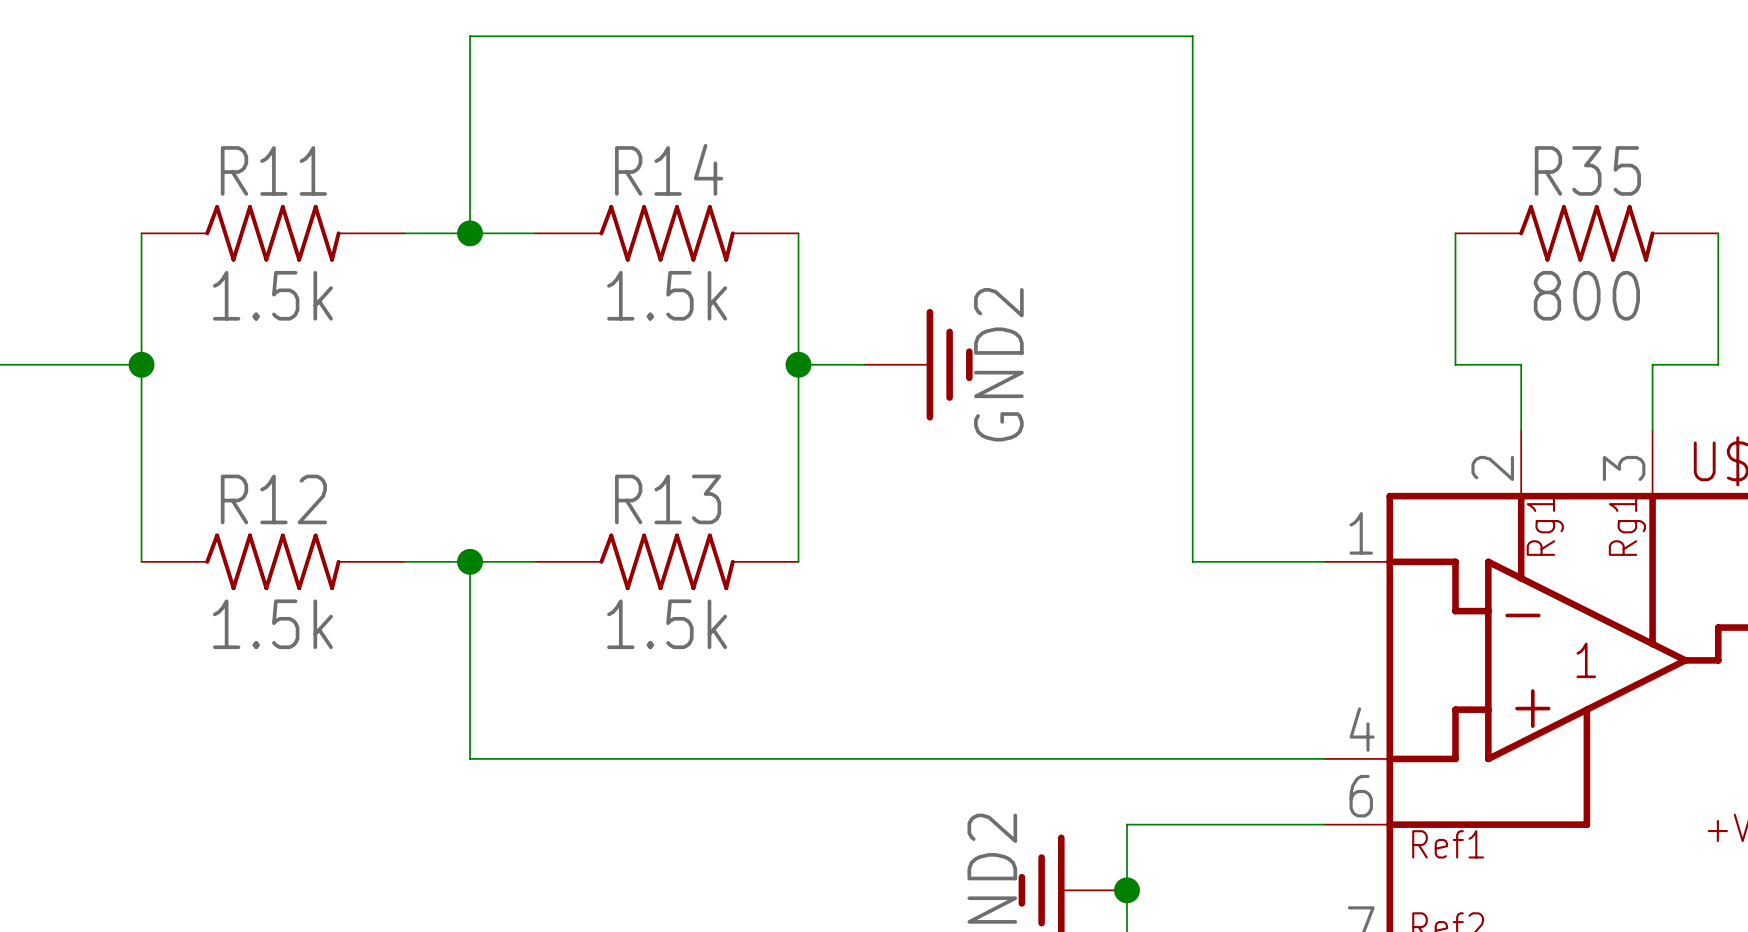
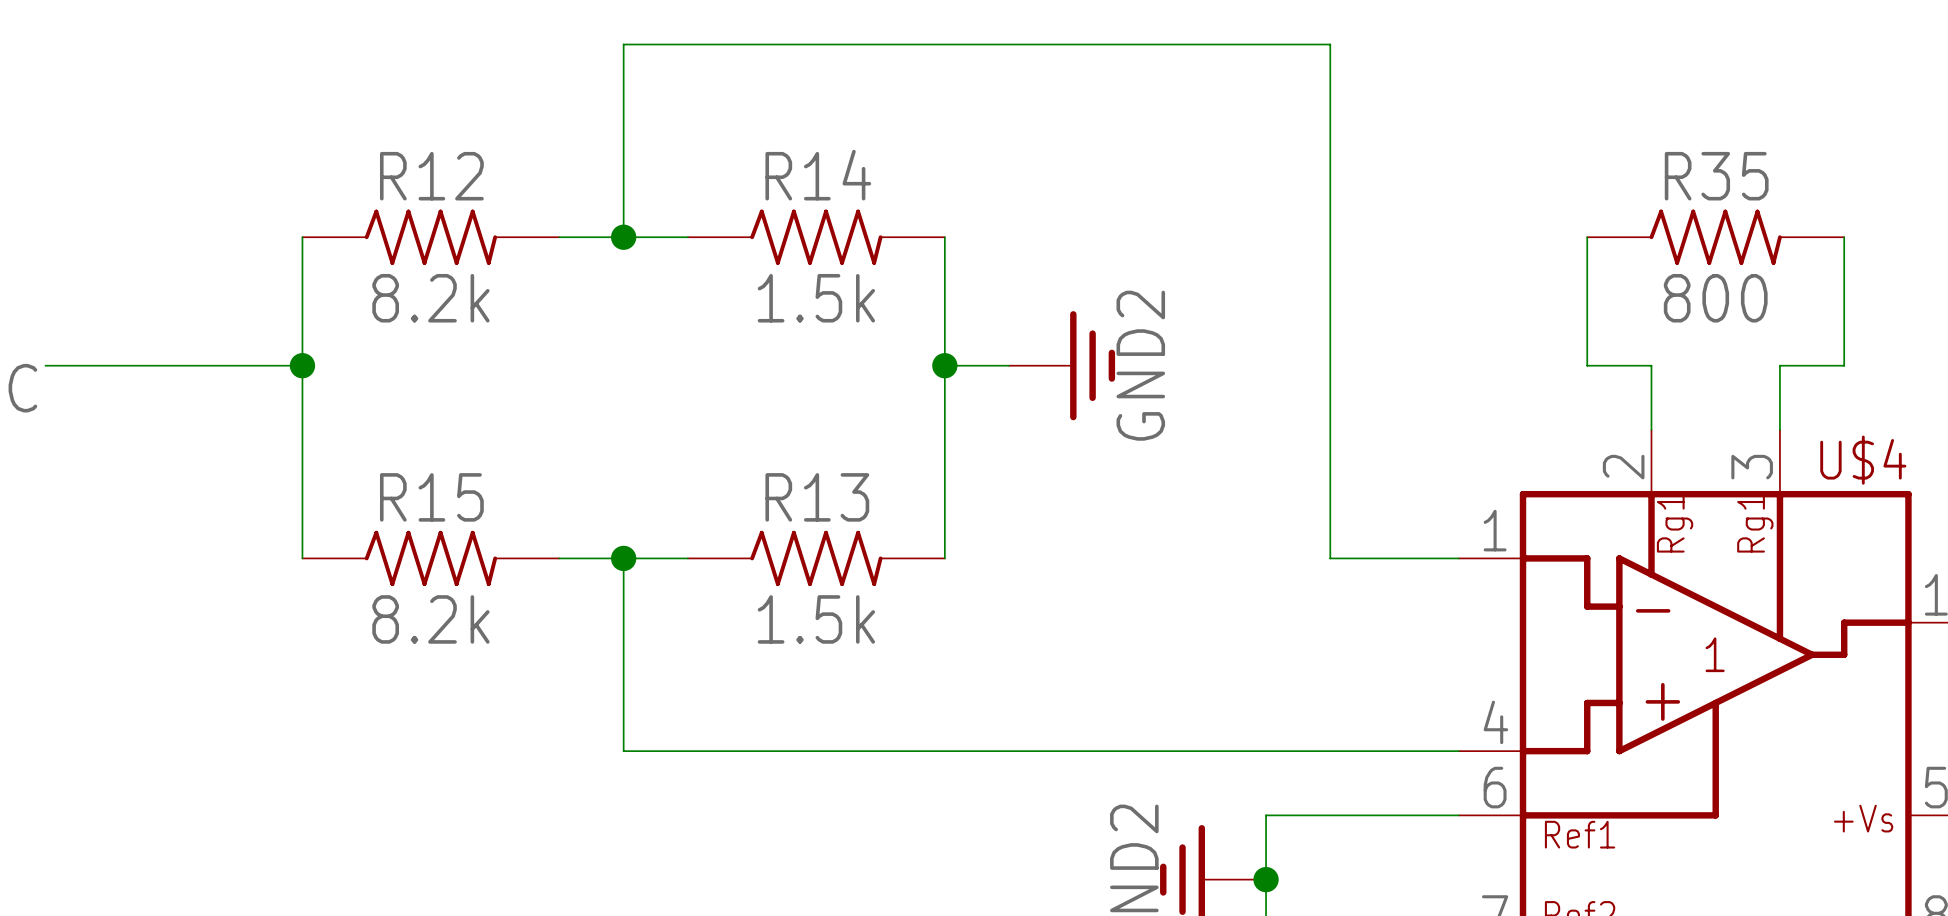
R11 name: R11 (273, 170) -> R12 (431, 176)
R11 value: 1.5k (272, 295) -> 8.2k (430, 298)
R12 name: R12 (273, 499) -> R15 (431, 497)
R12 value: 1.5k (272, 624) -> 8.2k (430, 619)

